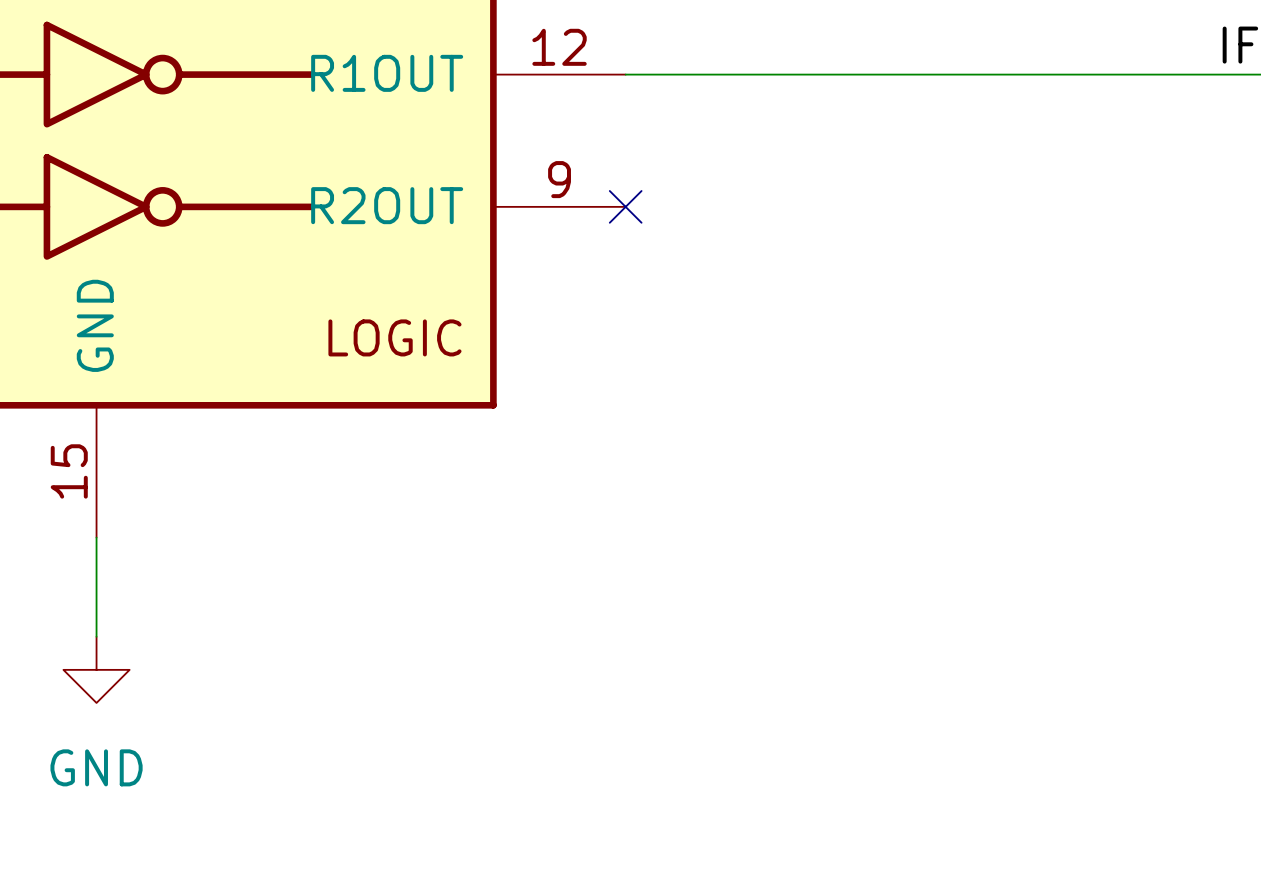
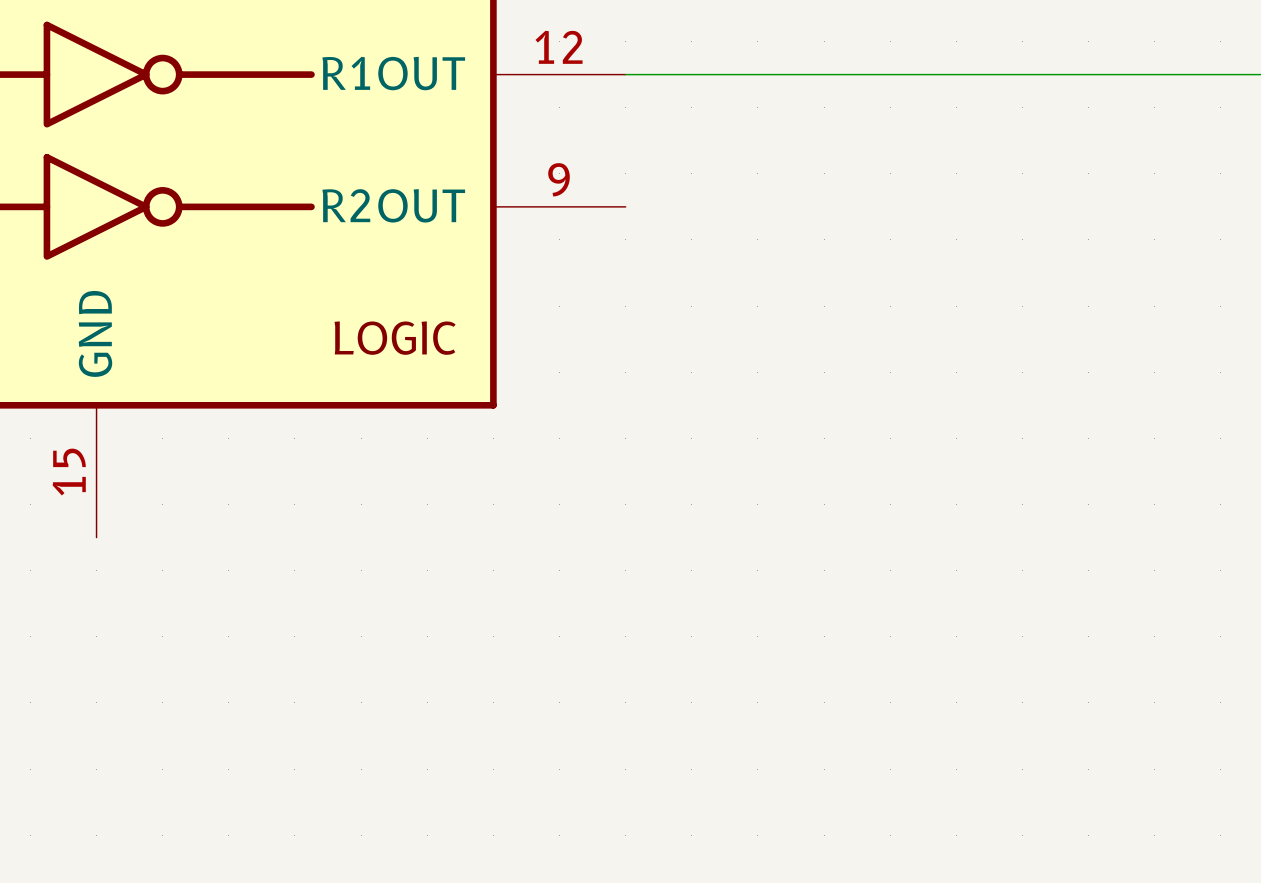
no-connect mark: (625, 206) -> none
wire: (96, 537) (96, 636) -> none
power symbol: GND (96, 669) -> none

